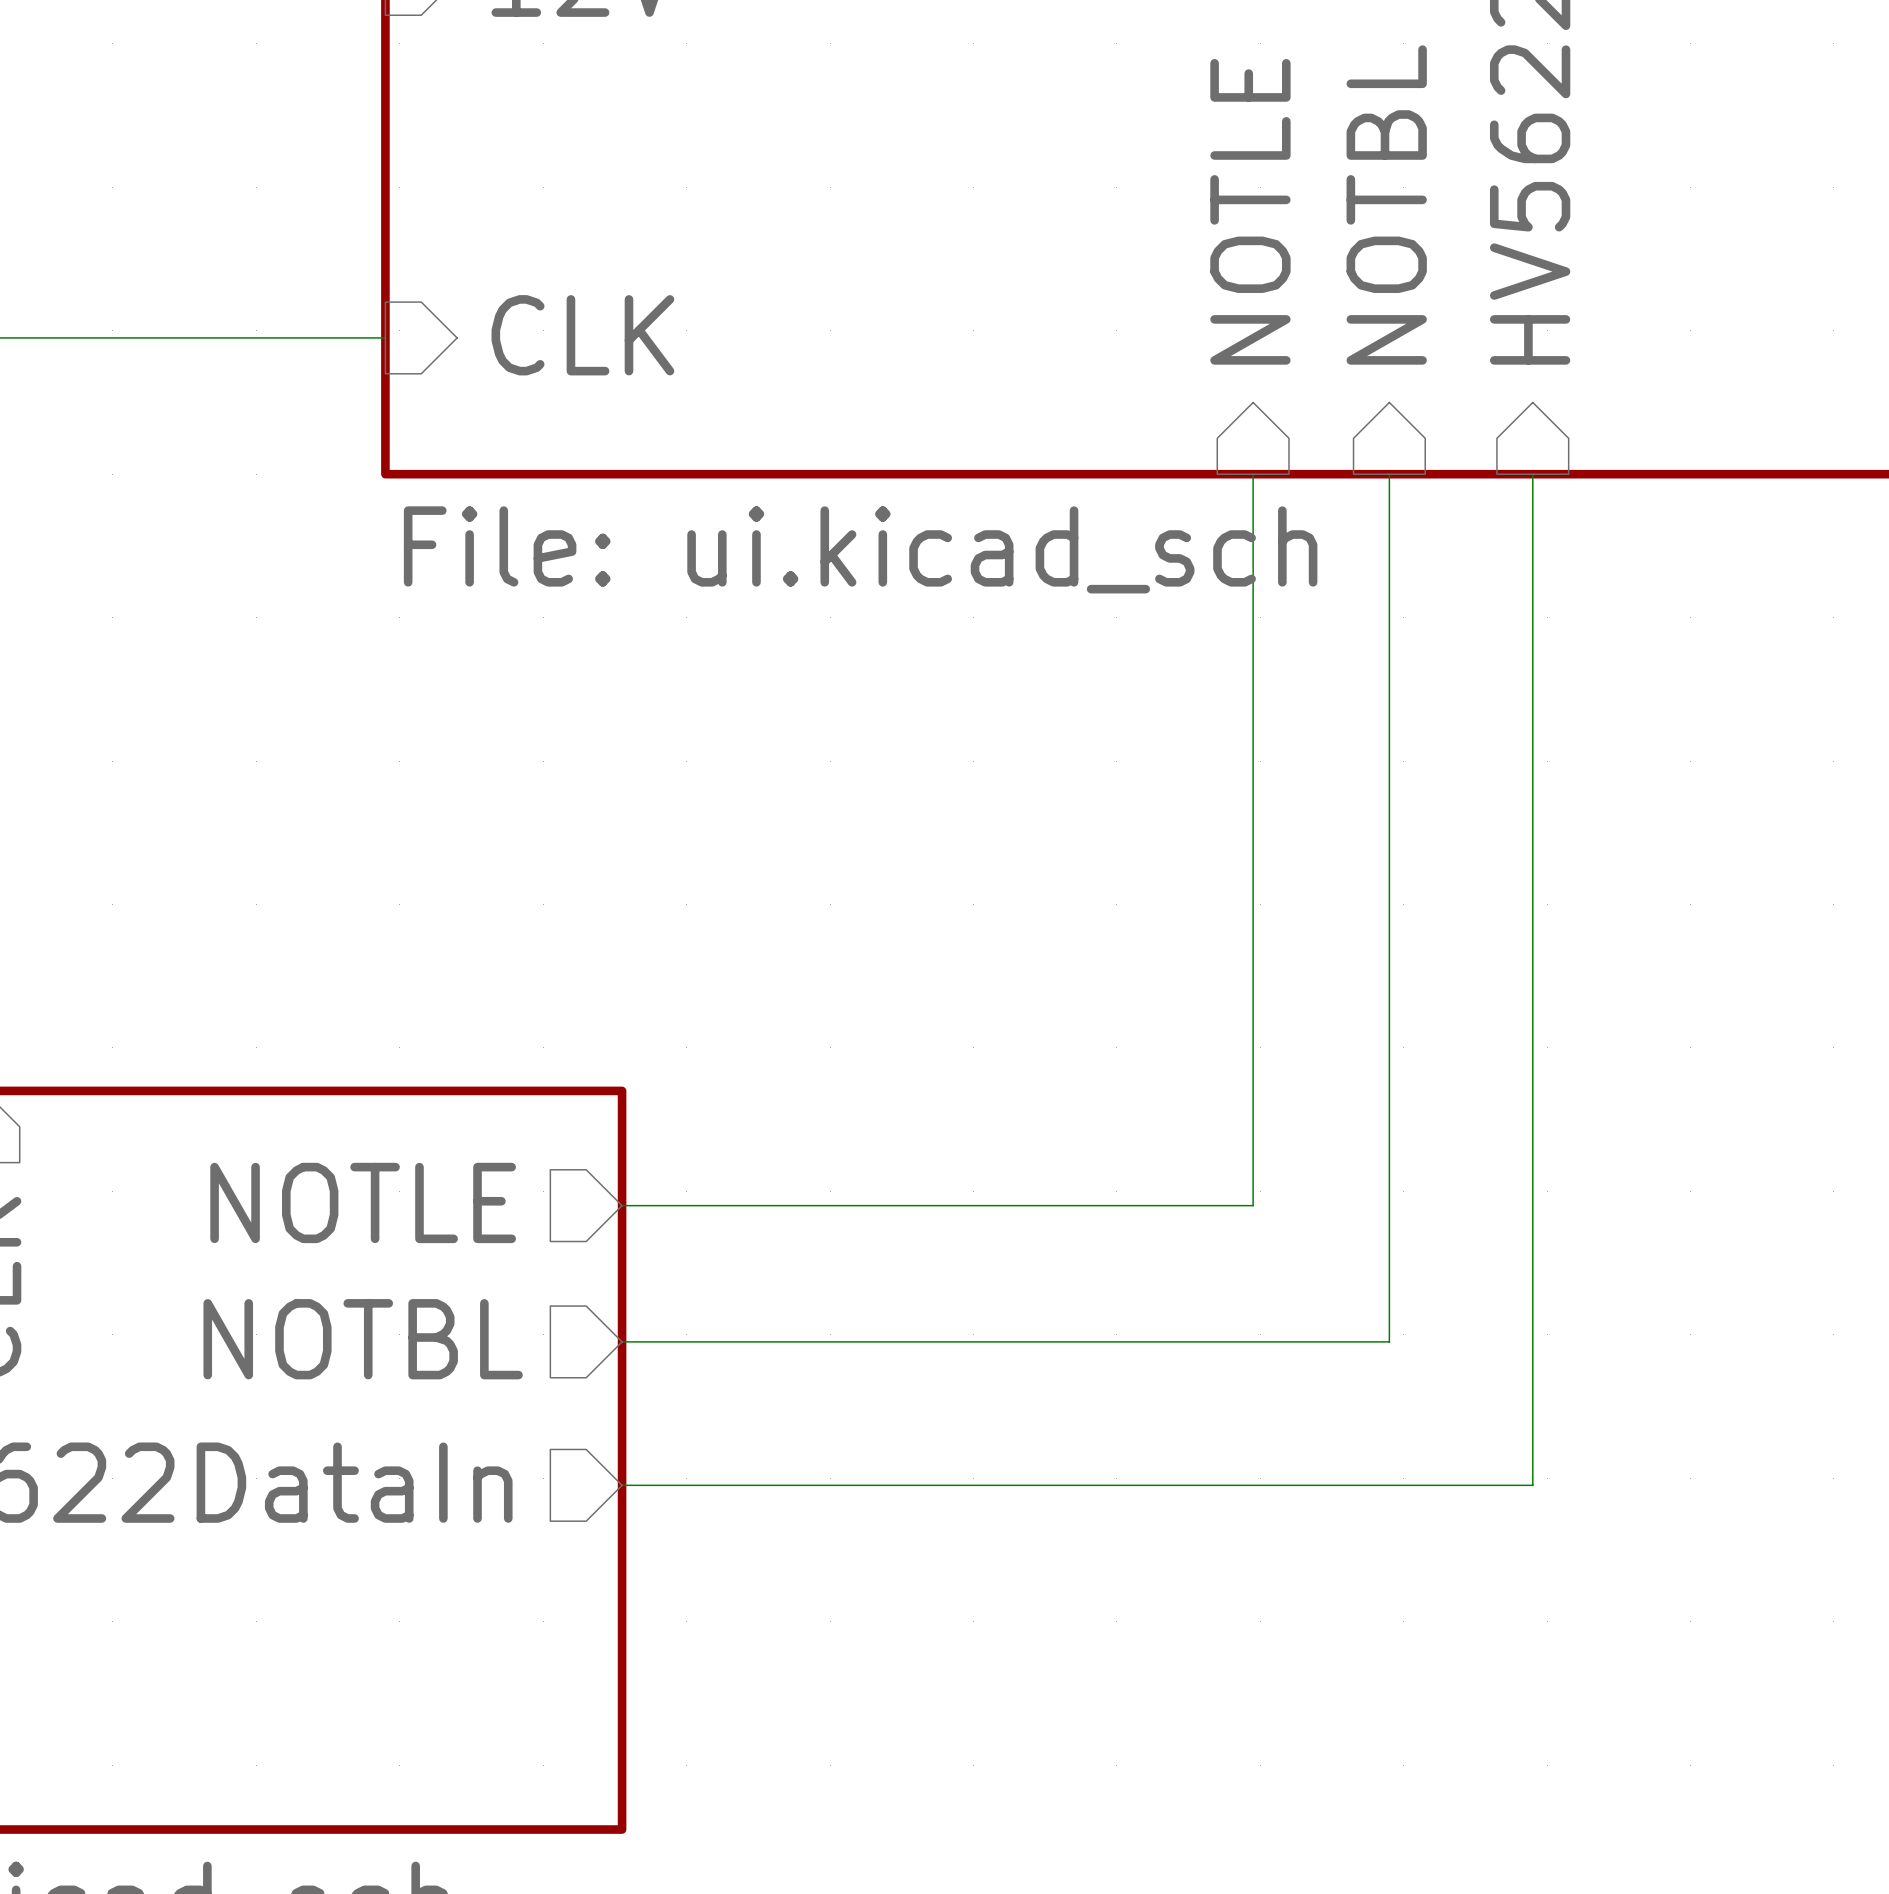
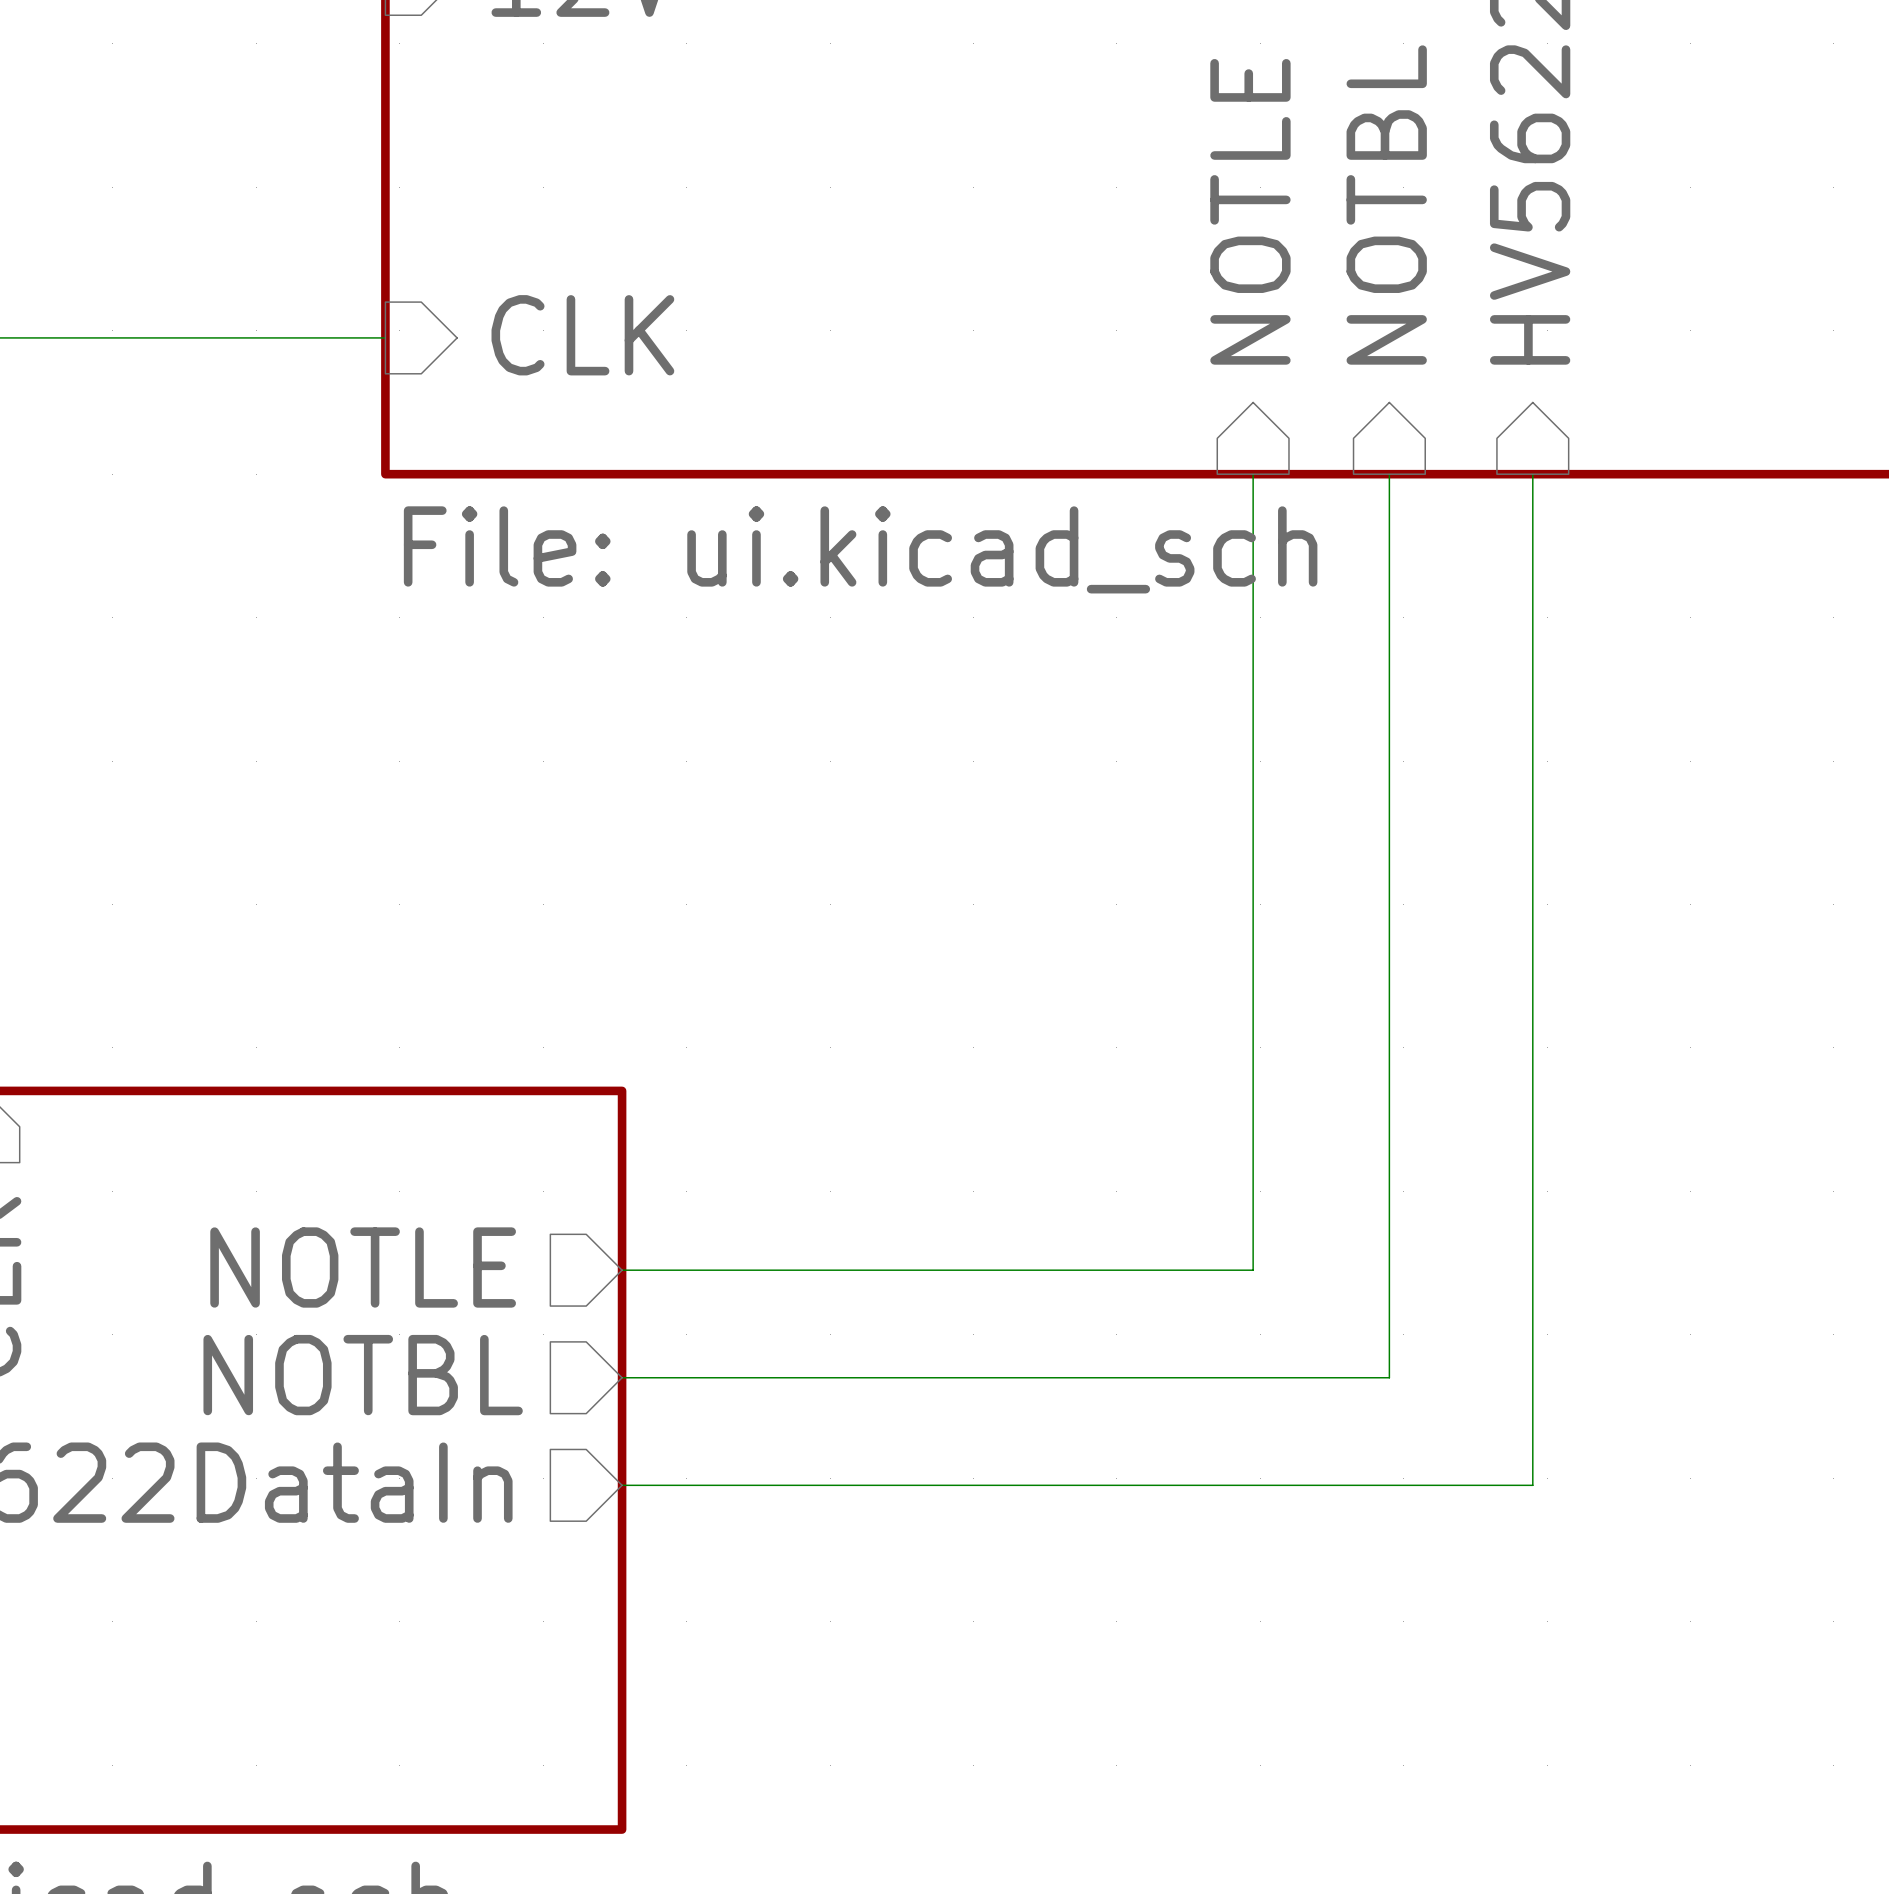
sheet pin position: NOTLE (363, 1202) -> NOTLE (363, 1267)
wire: (622, 1205) (1253, 1205) -> (622, 1270) (1253, 1270) (1253, 1205)
sheet pin position: NOTBL (363, 1339) -> NOTBL (363, 1375)
wire: (622, 1341) (1389, 1341) -> (622, 1377) (1389, 1377) (1389, 1341)

